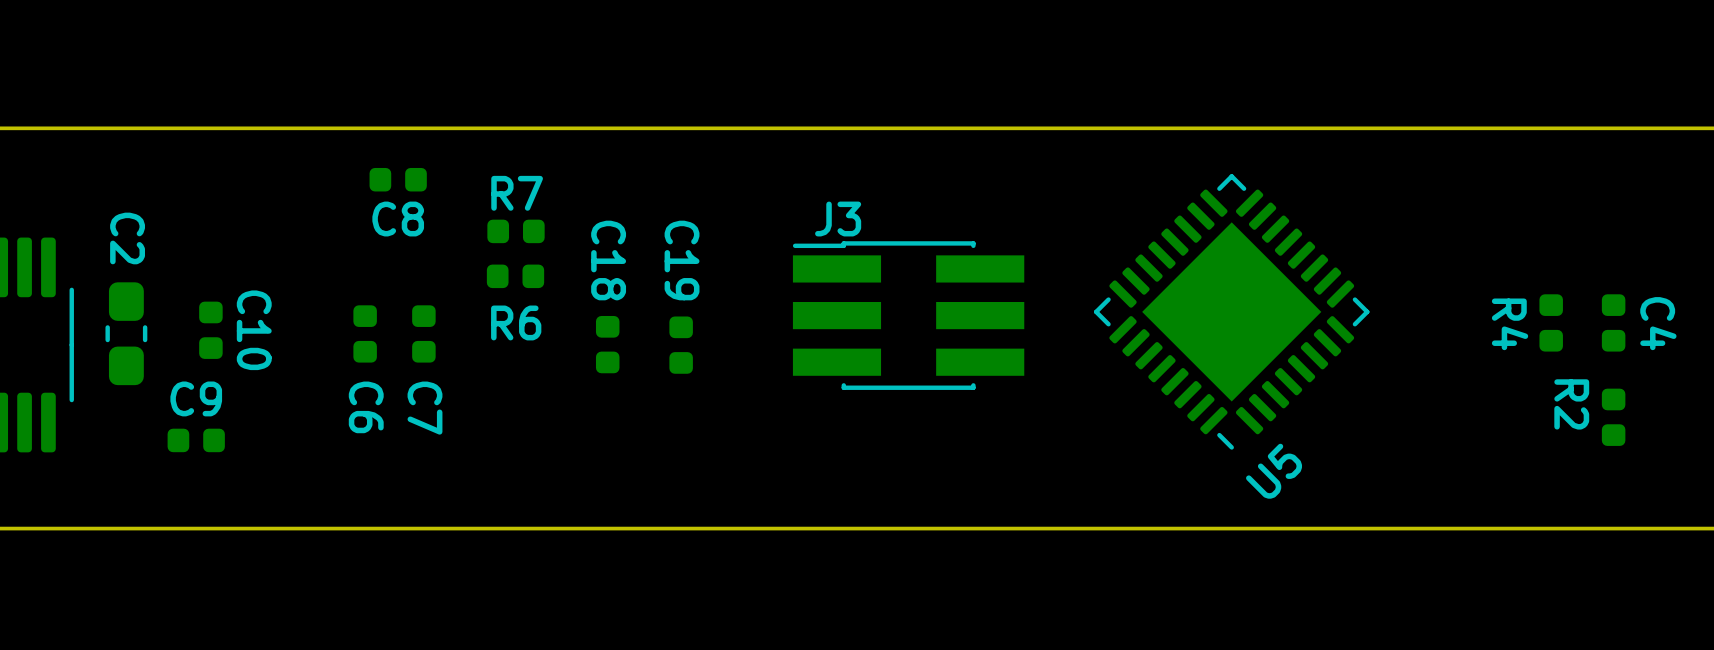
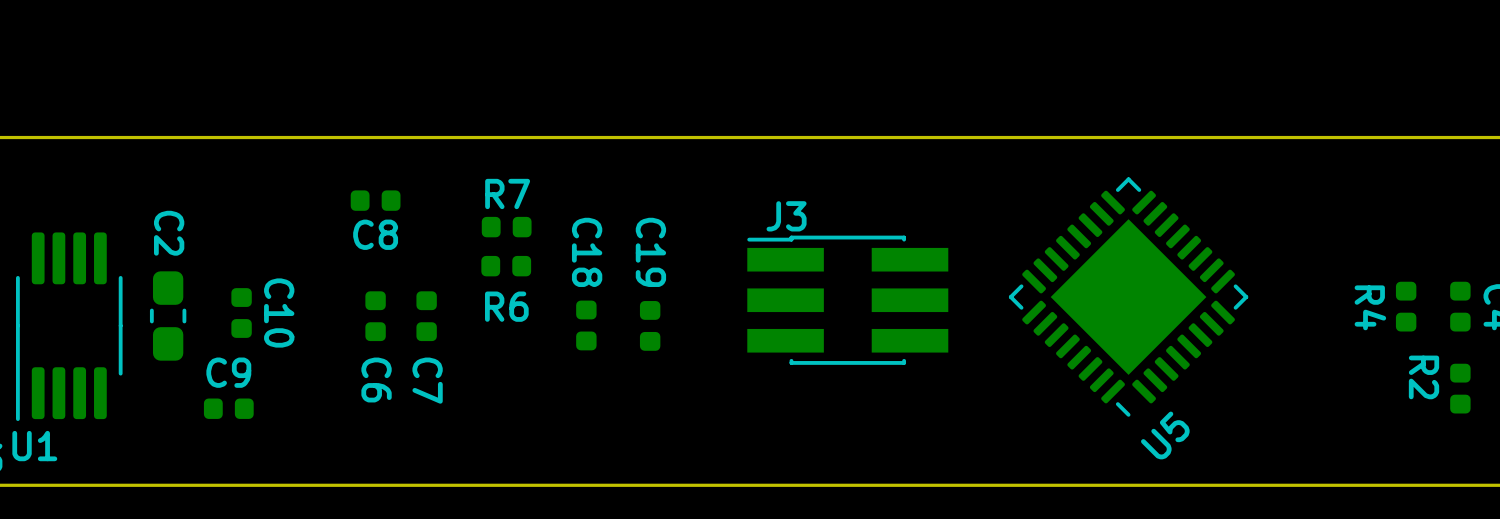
C8 position: (398, 179) -> (375, 200)

